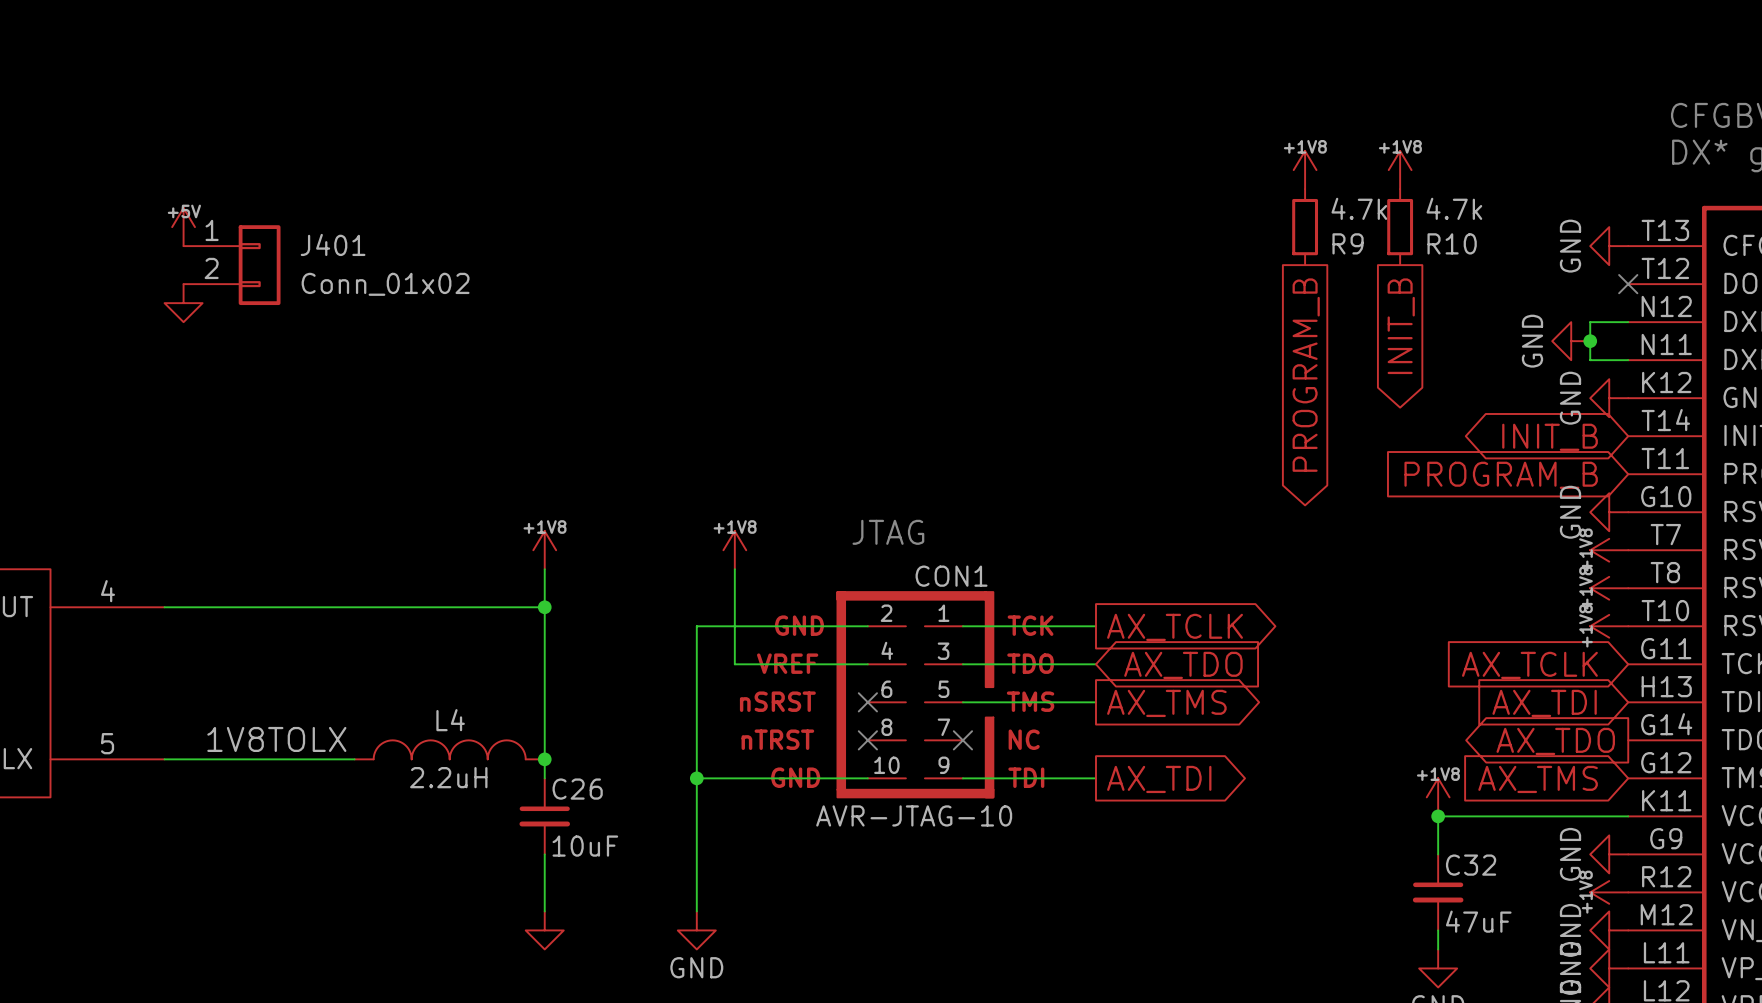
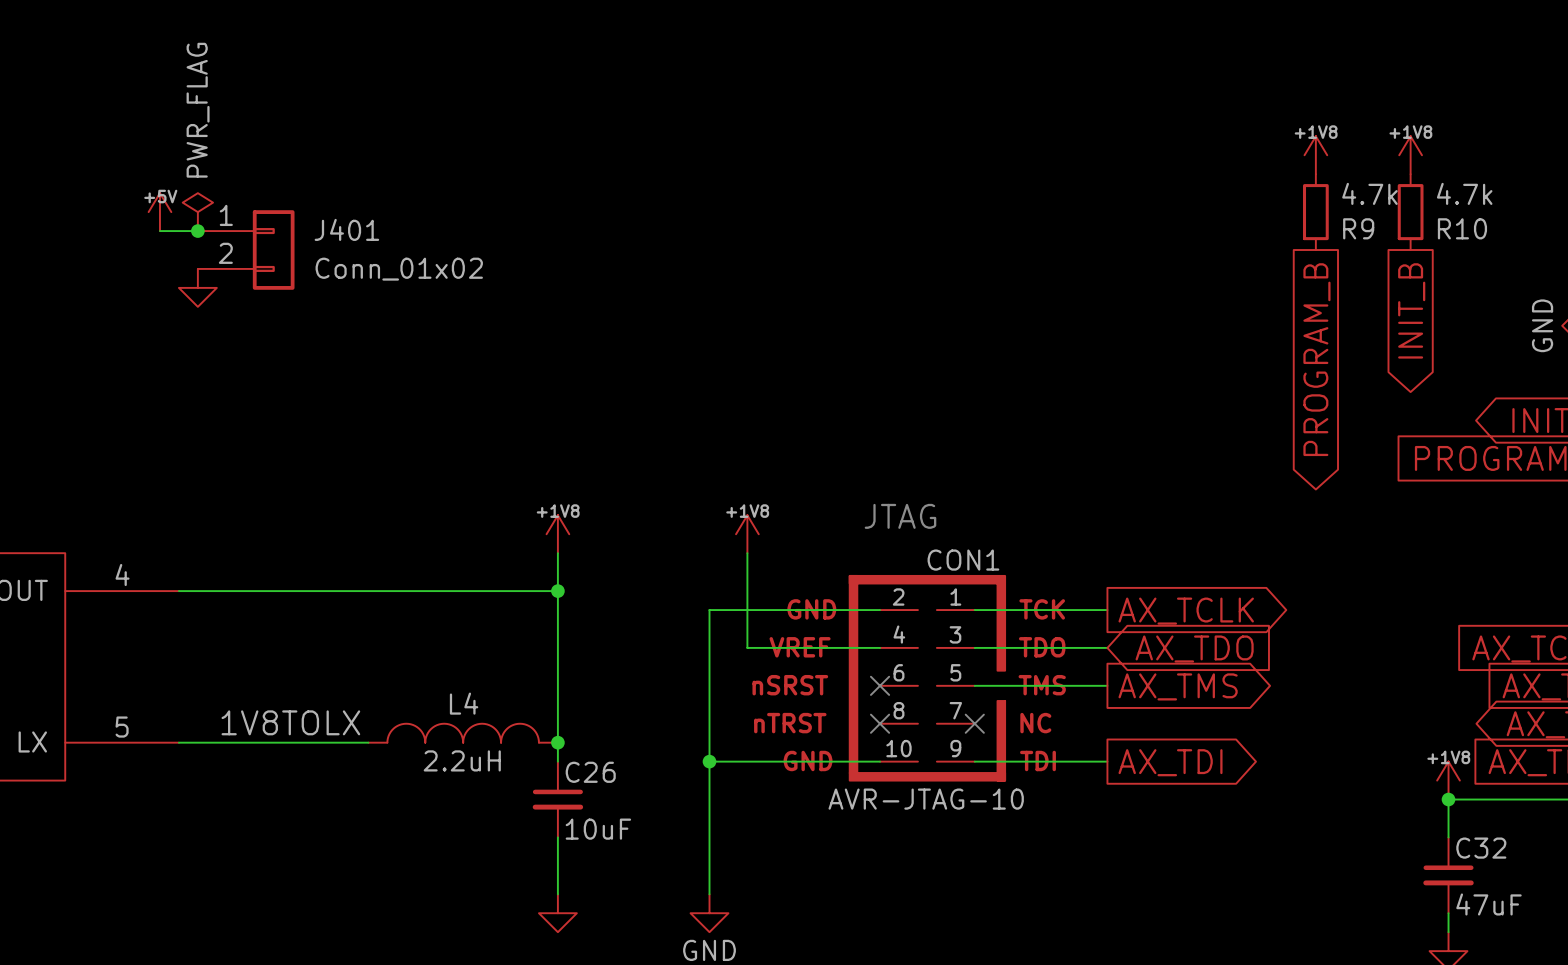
power symbol: none -> +5V (159, 212)
power symbol: +5V (183, 227) -> PWR_FLAG (197, 212)
wire: none -> (159, 231) (197, 231)
junction: none -> (197, 231)

